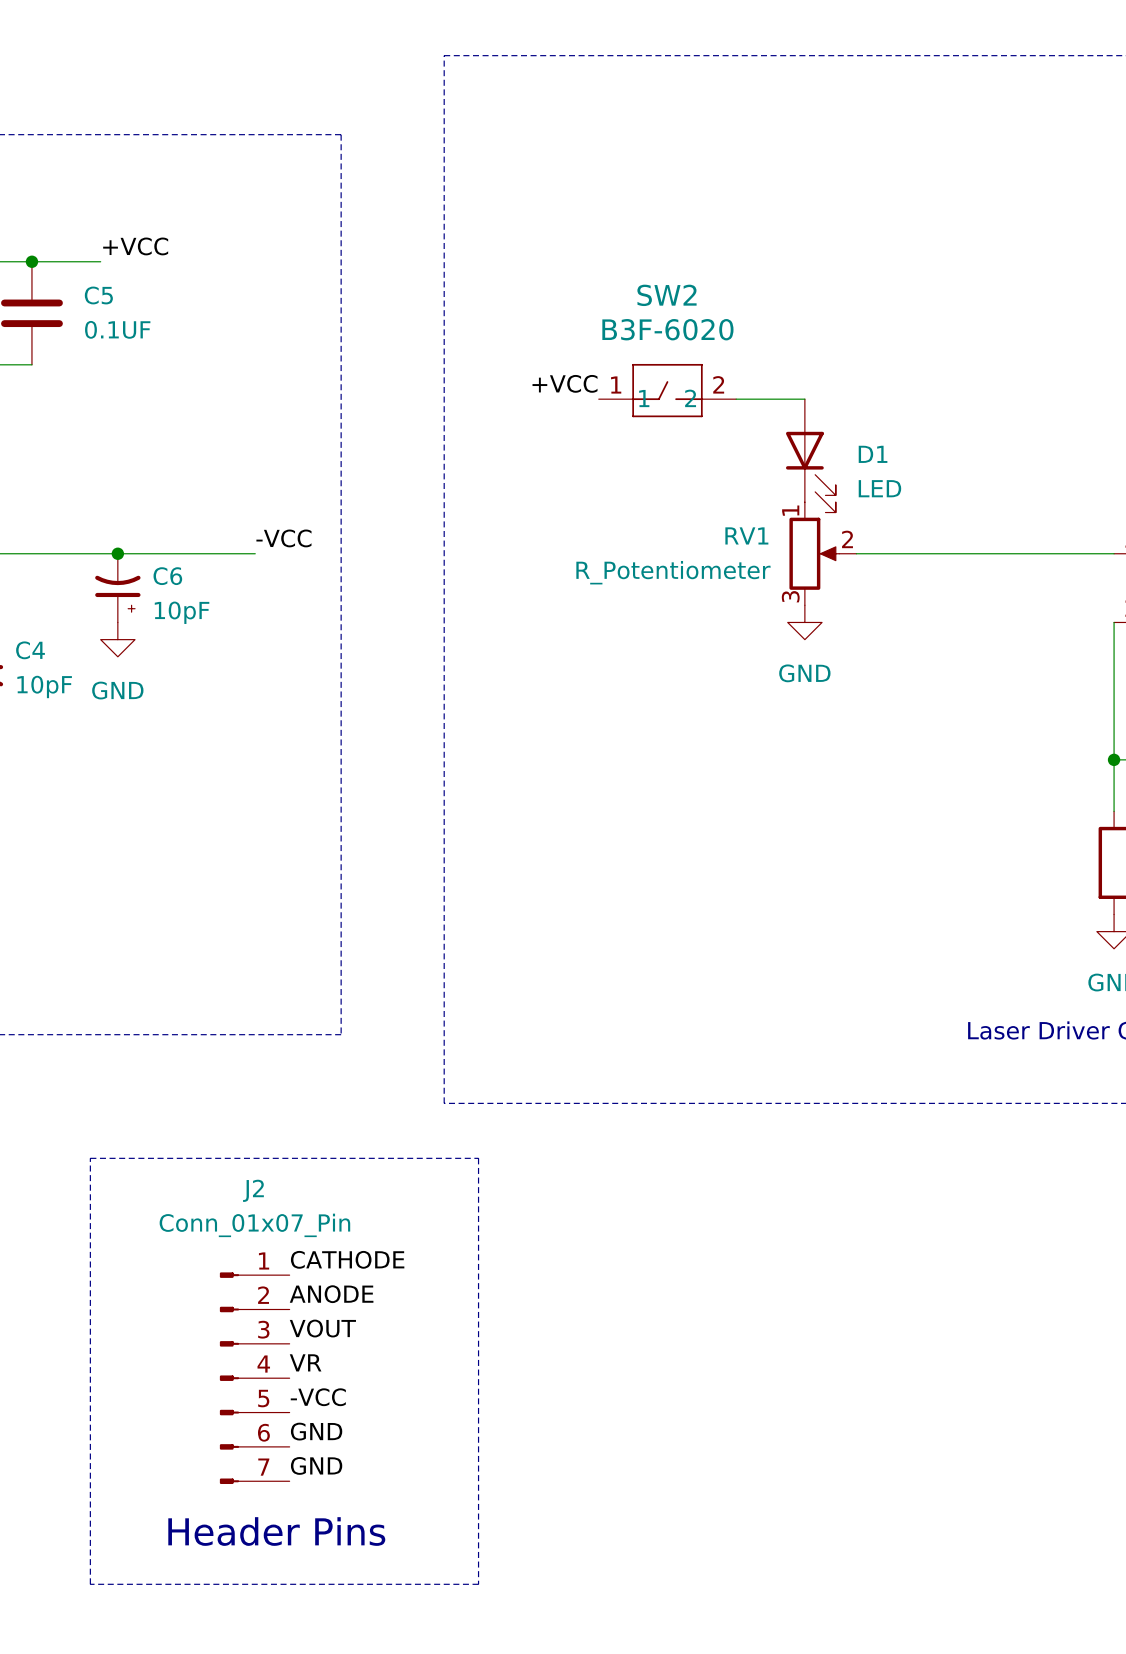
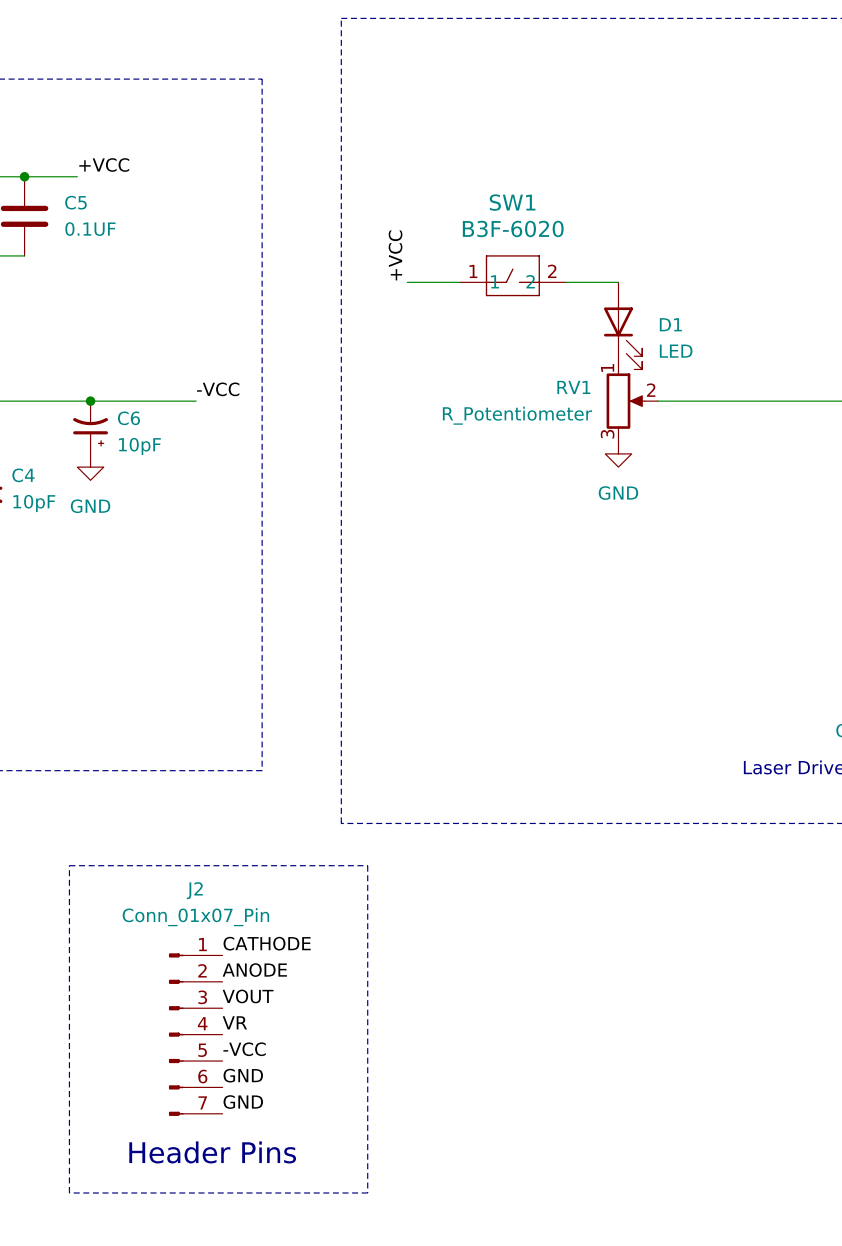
SW2 name: SW2 (666, 295) -> SW1 (512, 202)
label rotation: 0° (565, 383) -> 90° counterclockwise (395, 255)
wire: none -> (407, 282) (460, 282)

